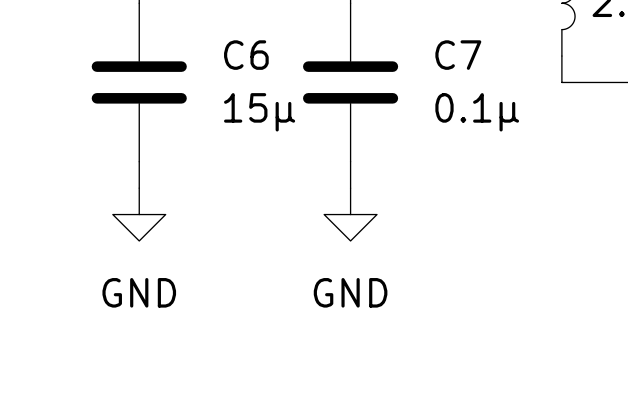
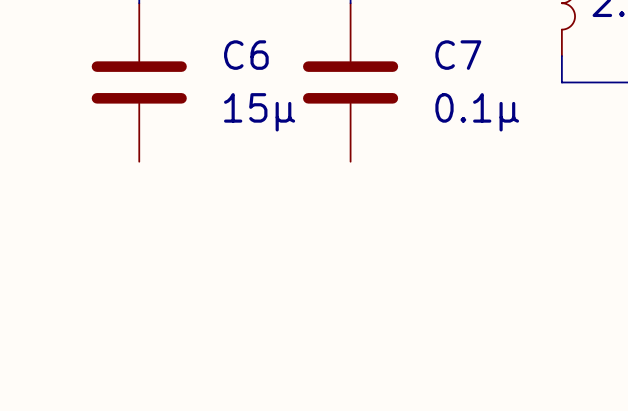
wire: (139, 161) (139, 188) -> none
wire: (350, 161) (350, 188) -> none
power symbol: GND (139, 214) -> none
power symbol: GND (350, 214) -> none

